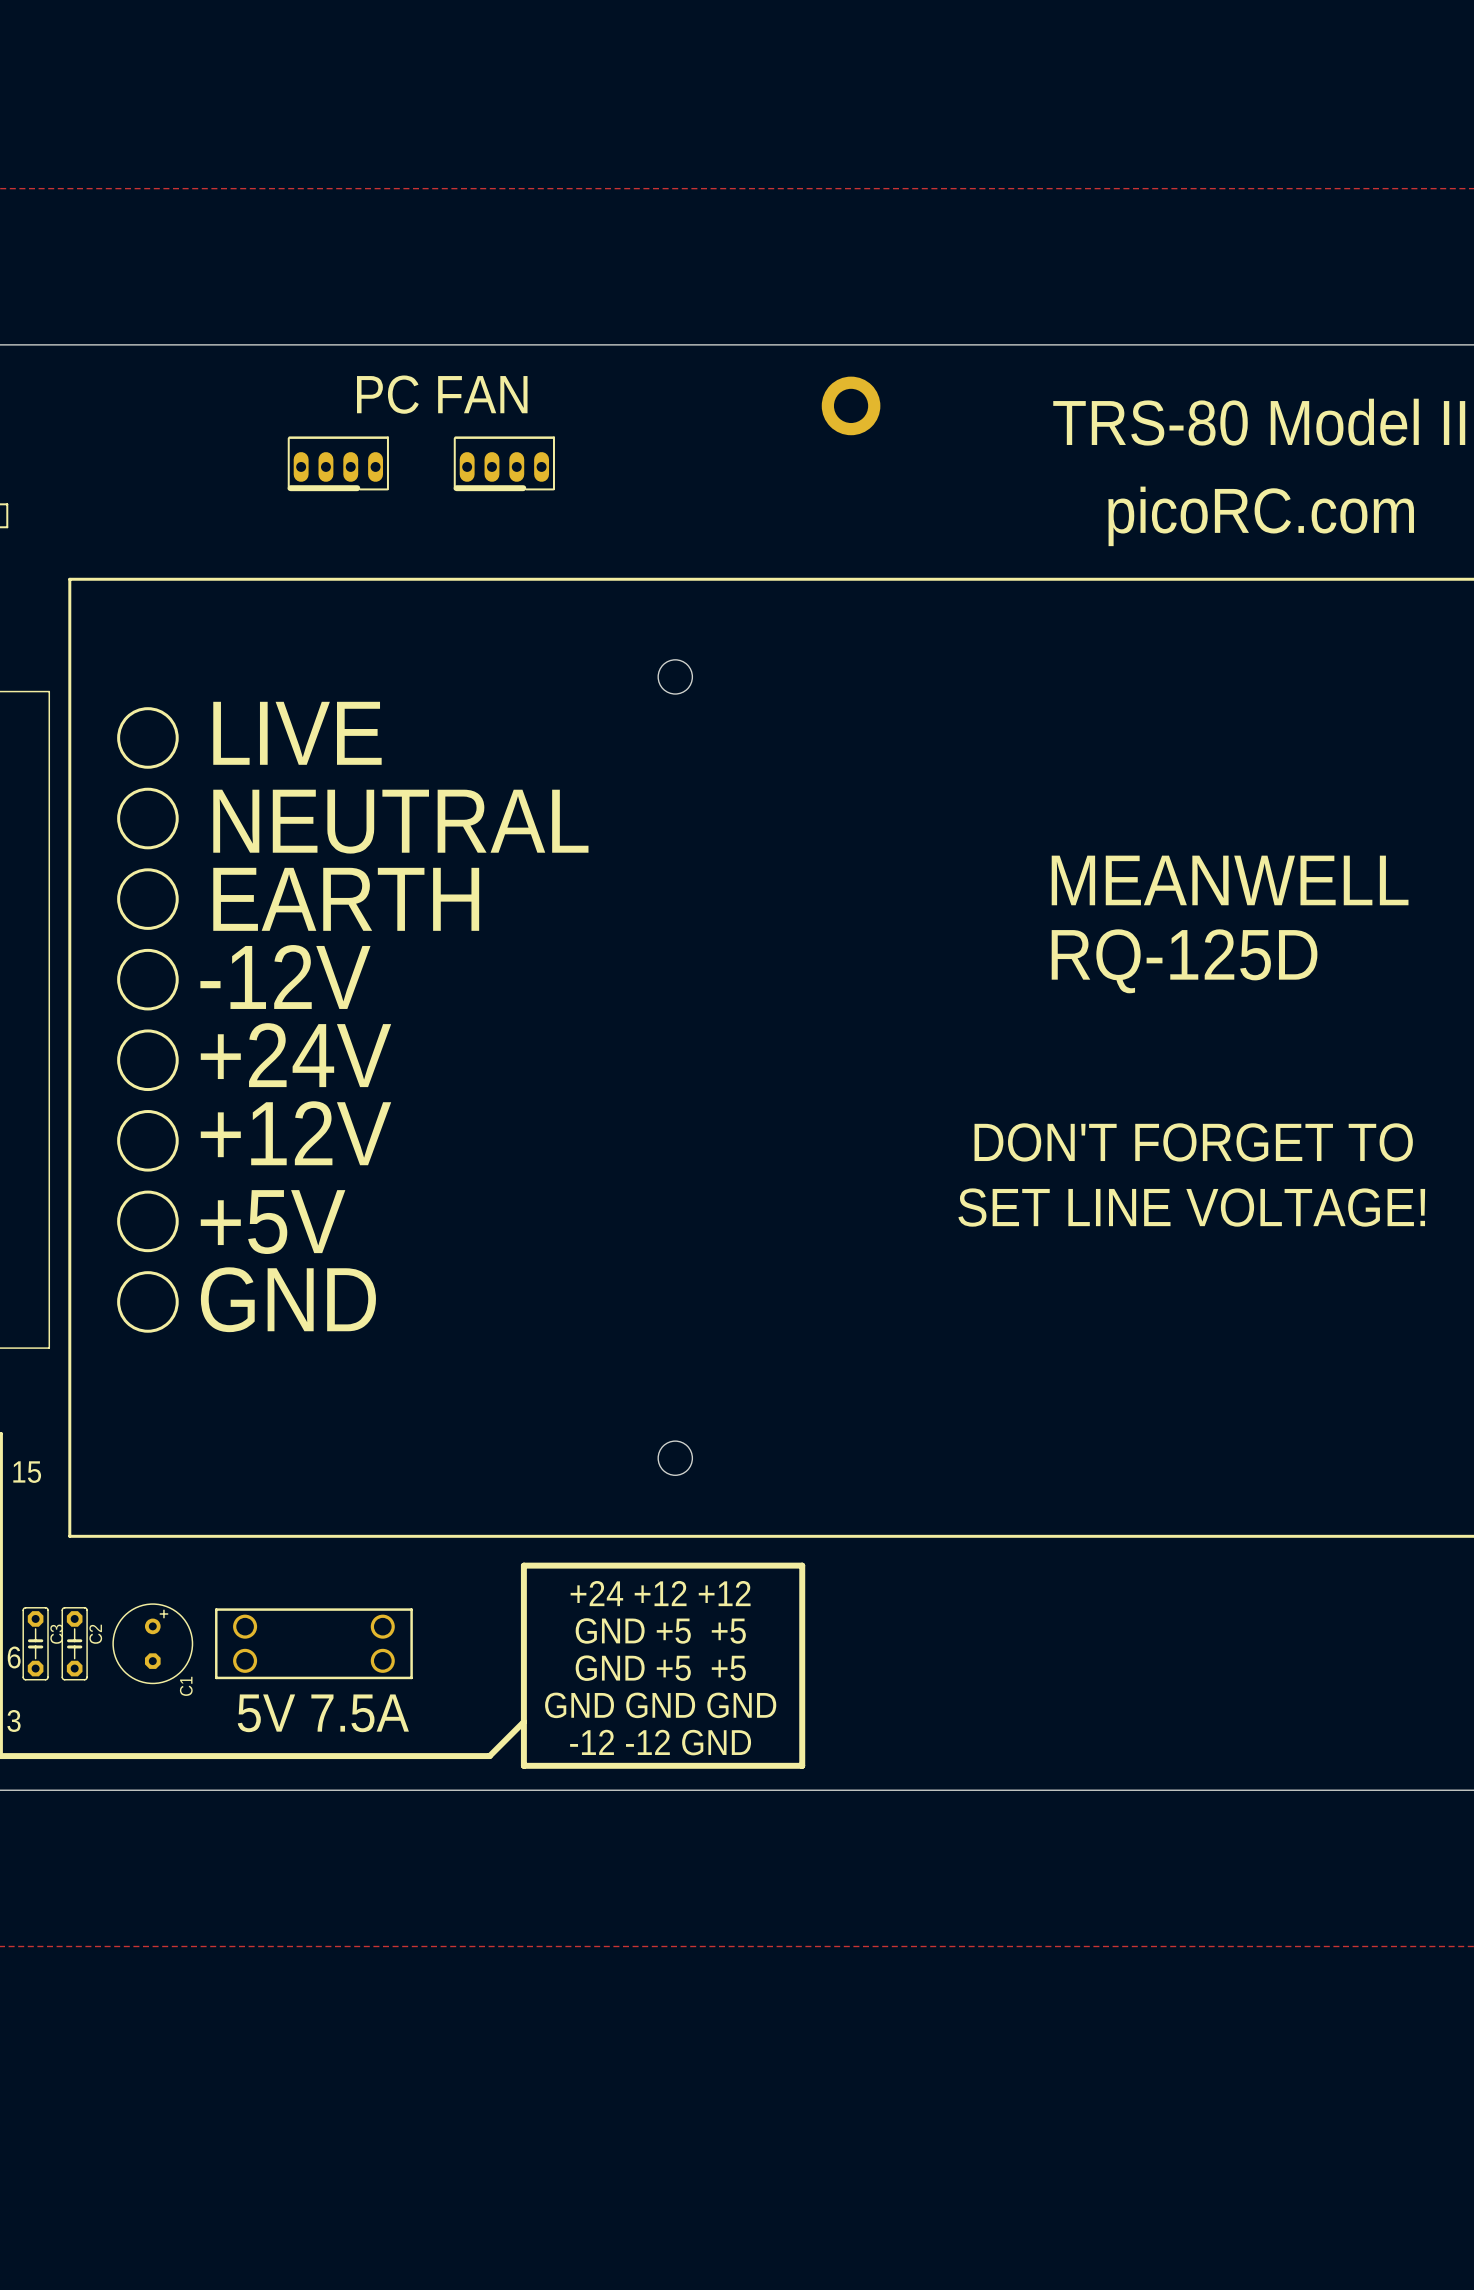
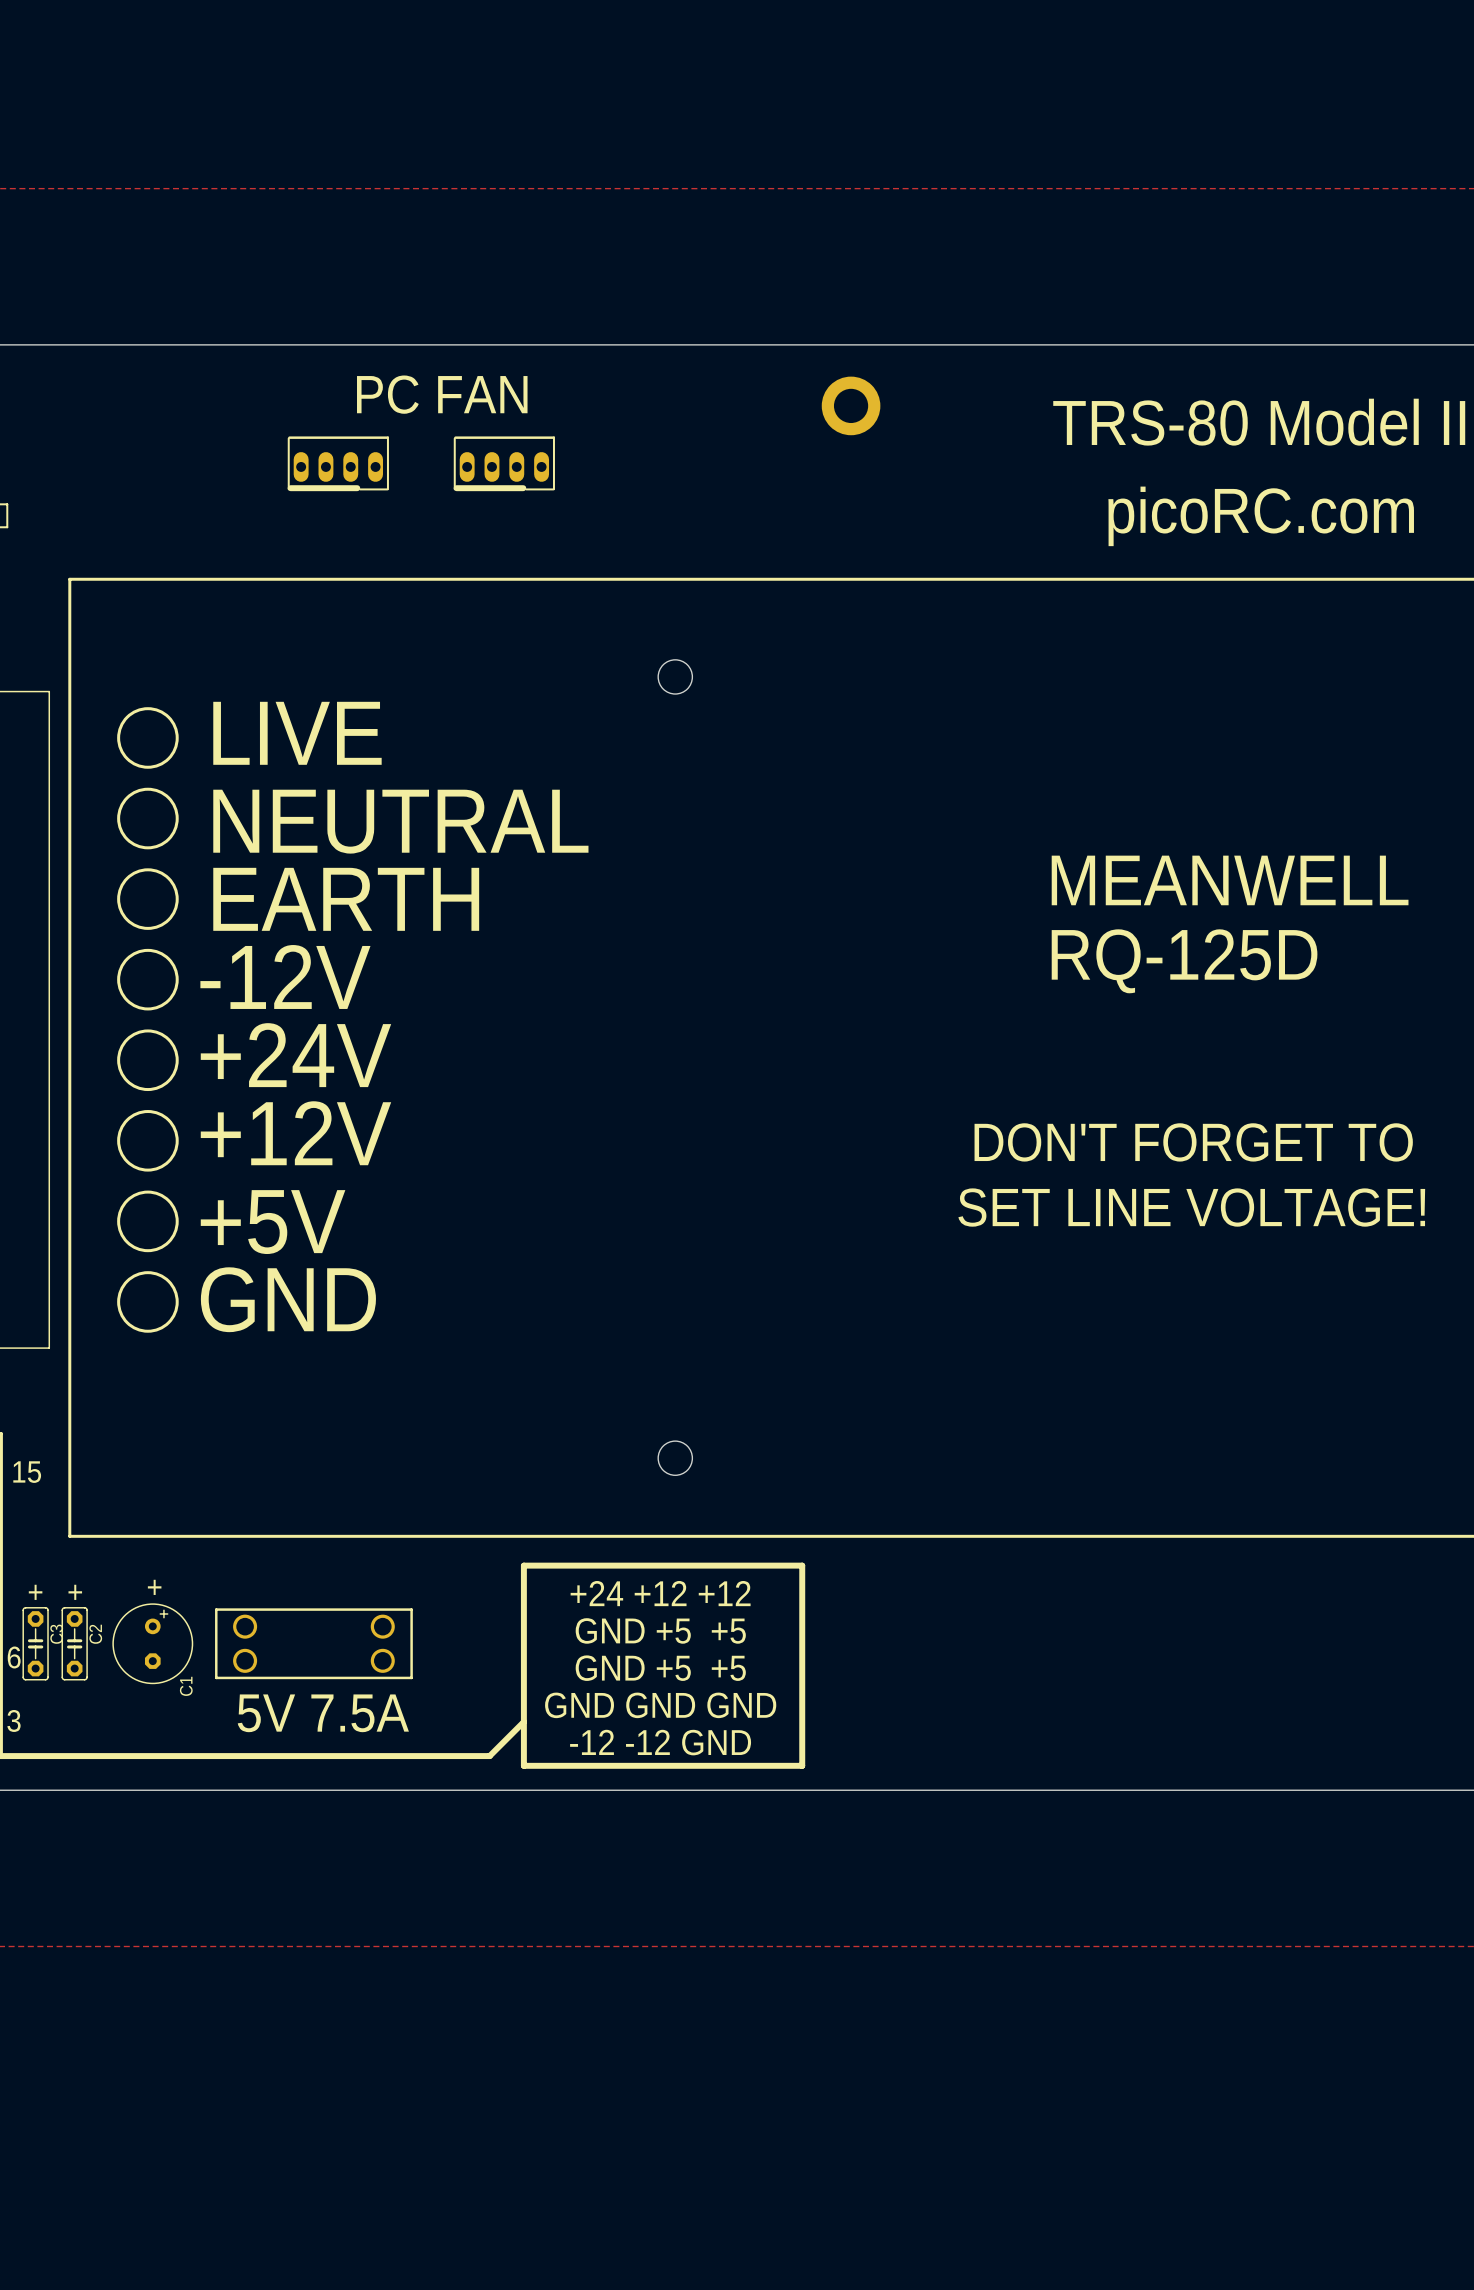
text: none -> + (154, 1587)
text: none -> + (35, 1592)
text: none -> + (75, 1592)

